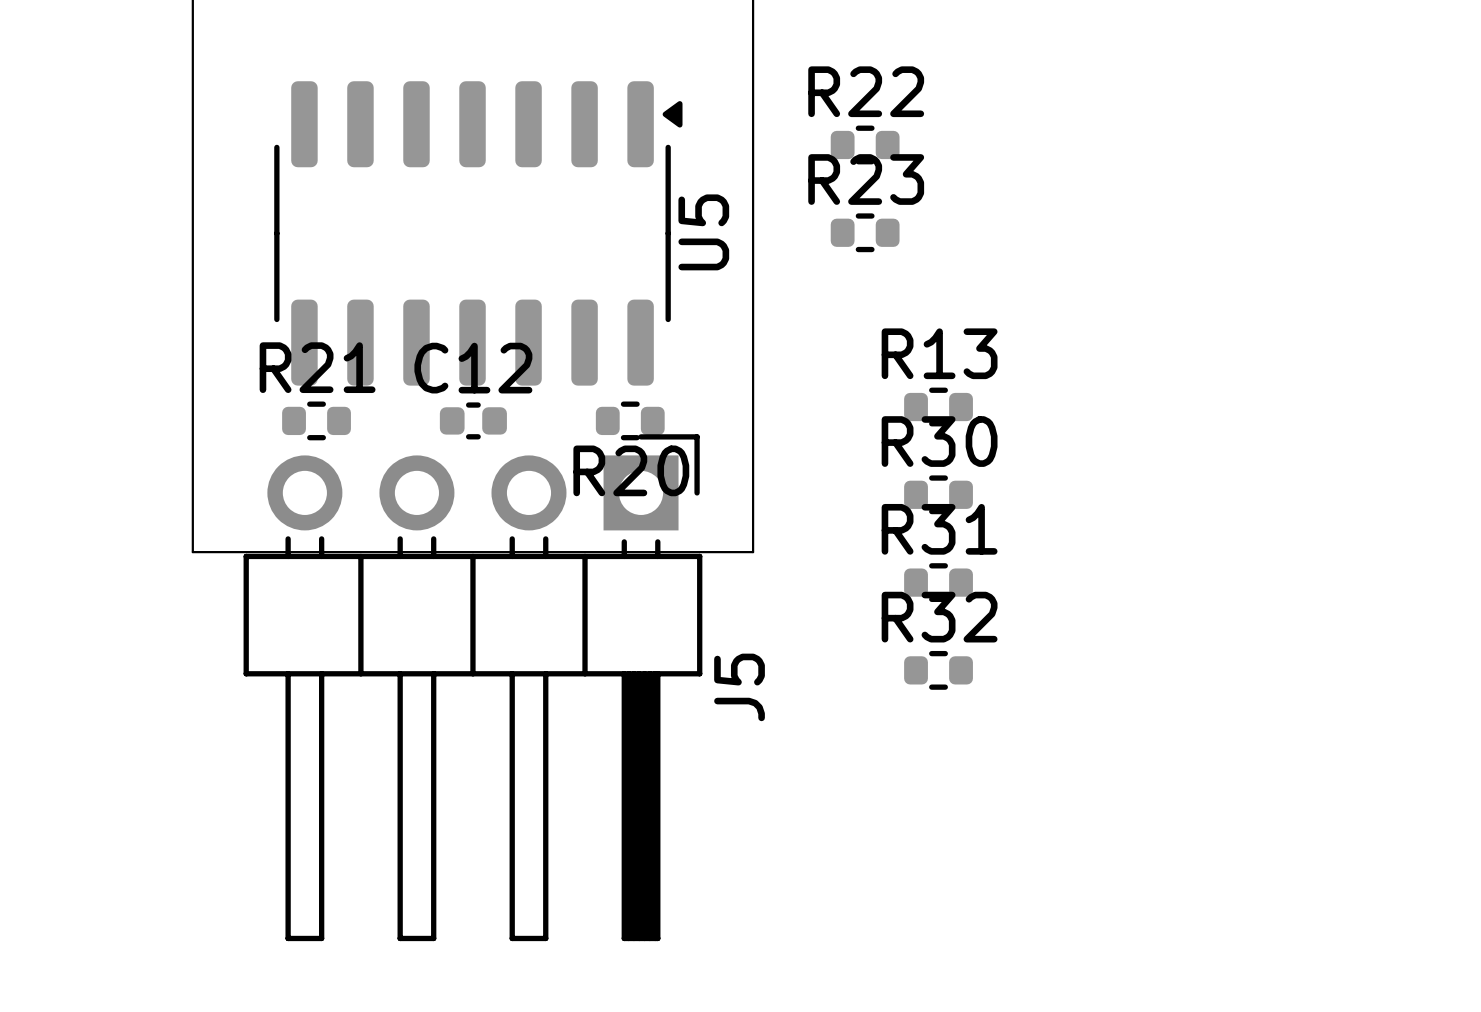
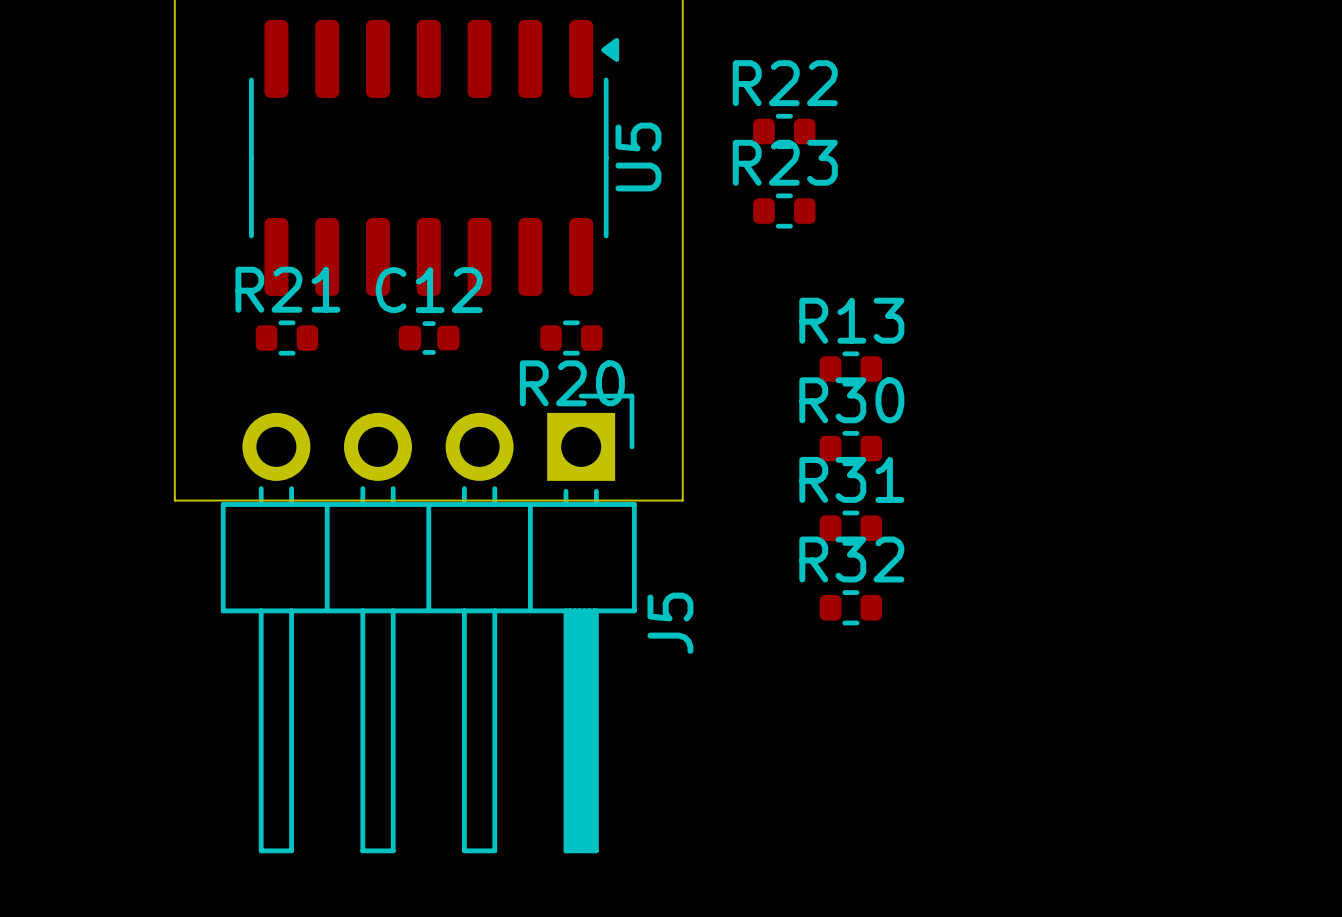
U5 position: (478, 233) -> (434, 157)
R21 position: (316, 420) -> (286, 338)
C12 position: (473, 420) -> (429, 338)
R20 position: (630, 420) -> (571, 338)

